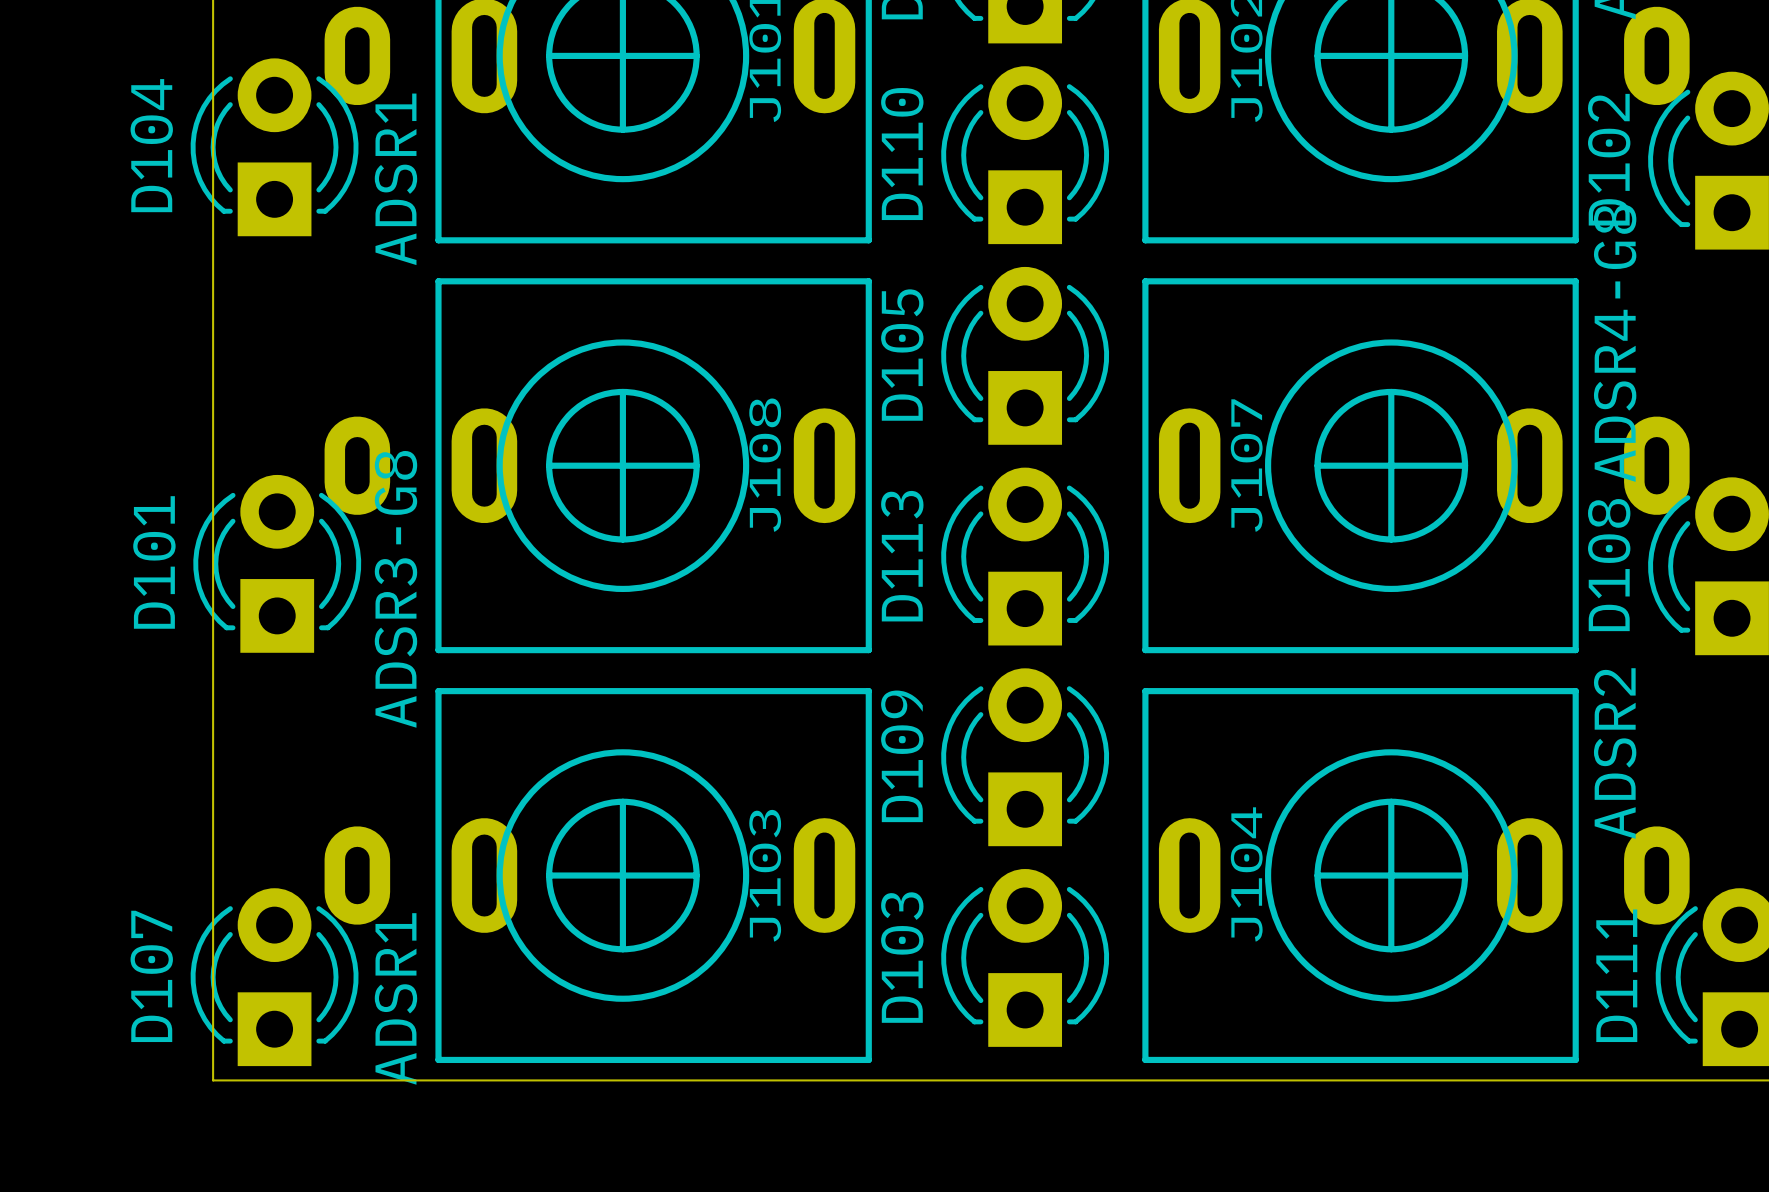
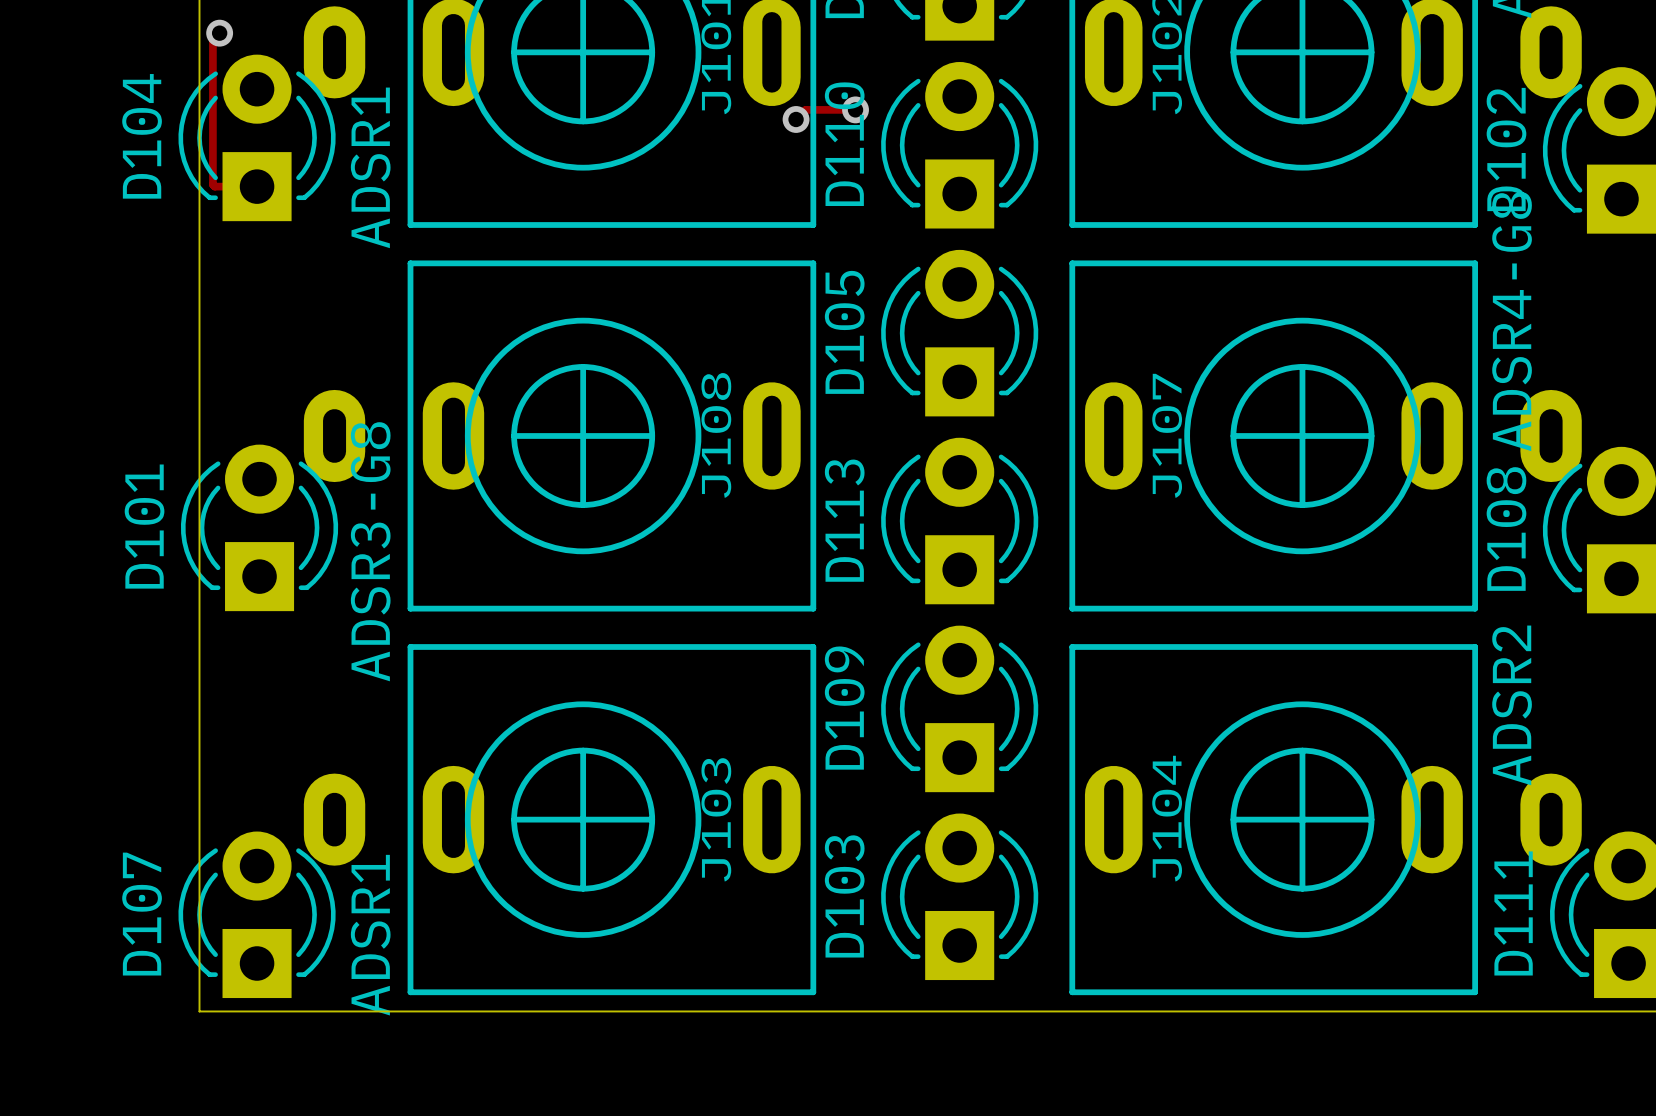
track: none -> (219, 33) (212, 39) (212, 184) (214, 186) (257, 186)
via: none -> (219, 33)
track: none -> (855, 109) (805, 109) (796, 119)
via: none -> (855, 109)
via: none -> (796, 119)

